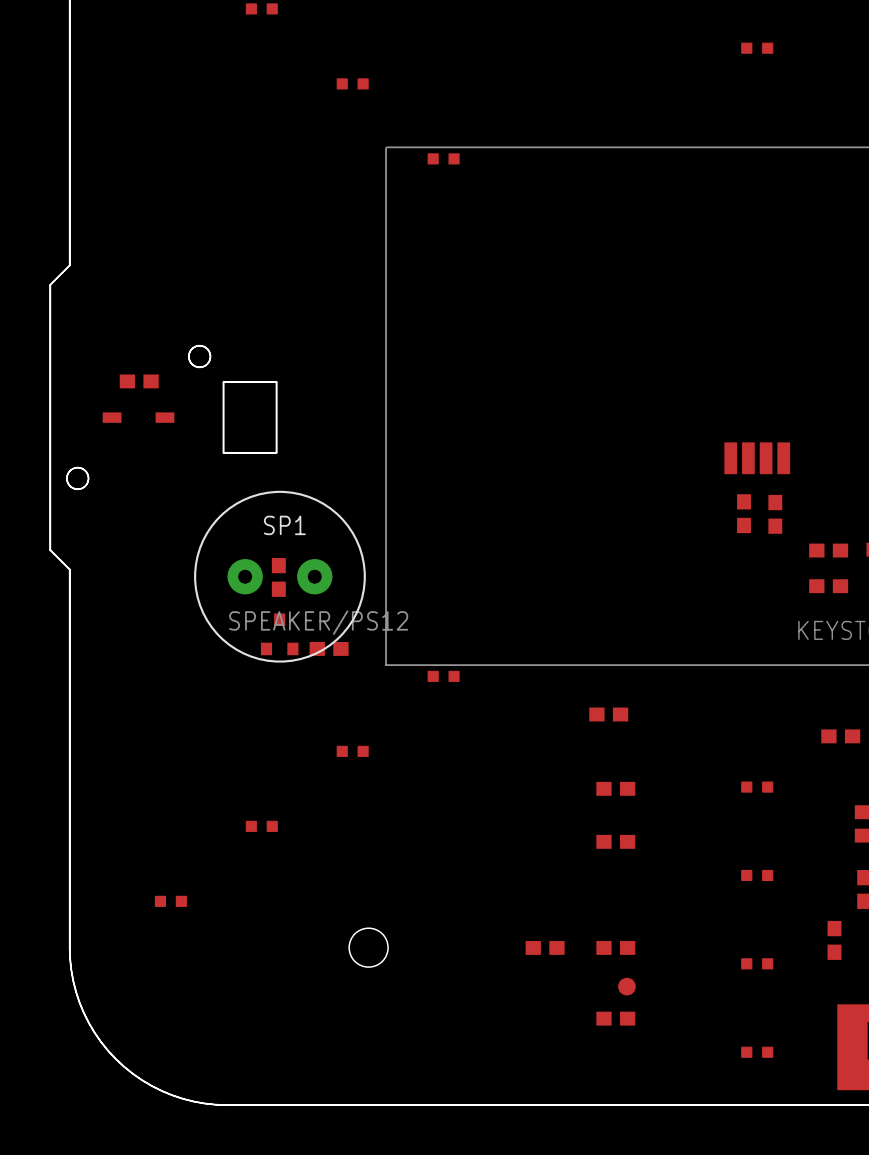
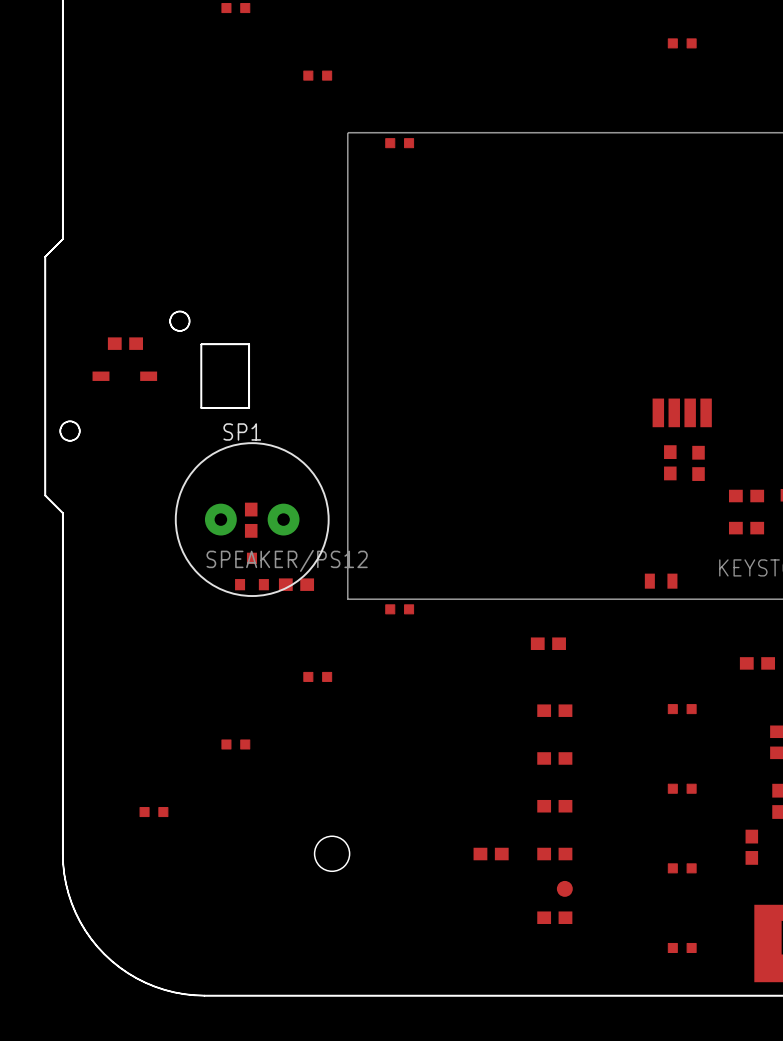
SP1 name position: SP1 (284, 525) -> SP1 (242, 431)
part: none -> (661, 581)
part: none -> (554, 806)

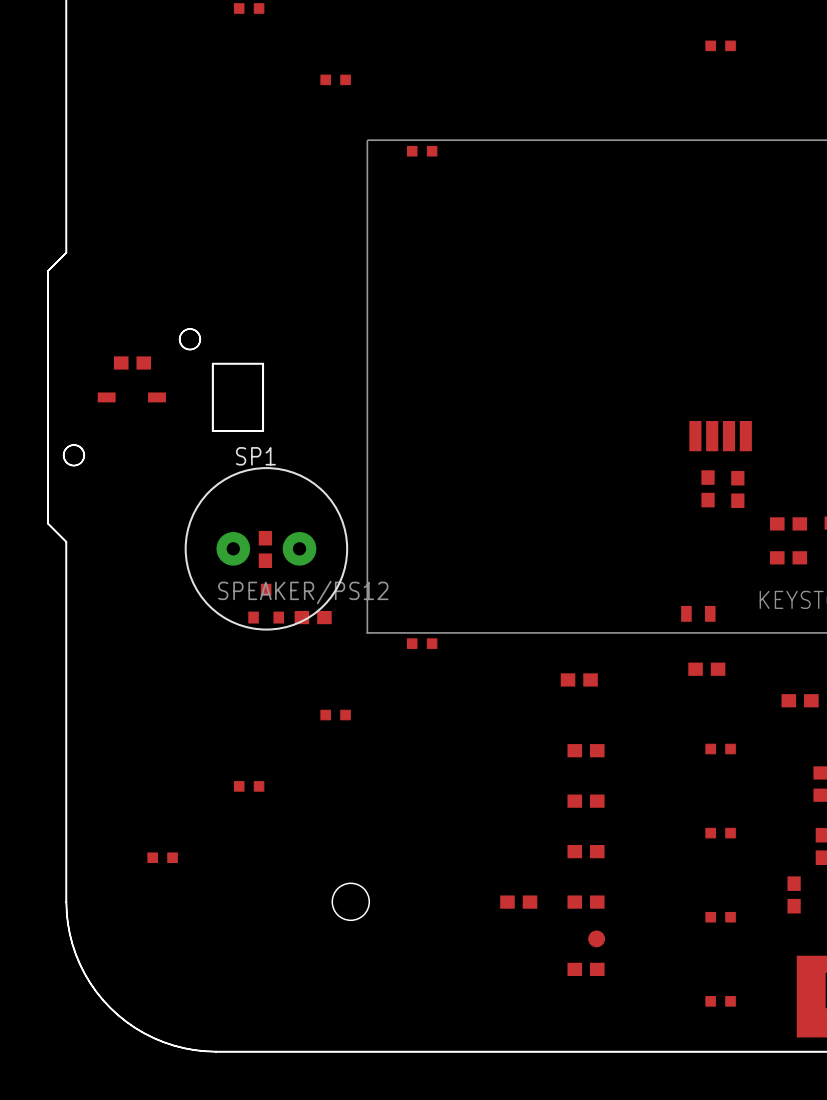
part: none -> (706, 669)

